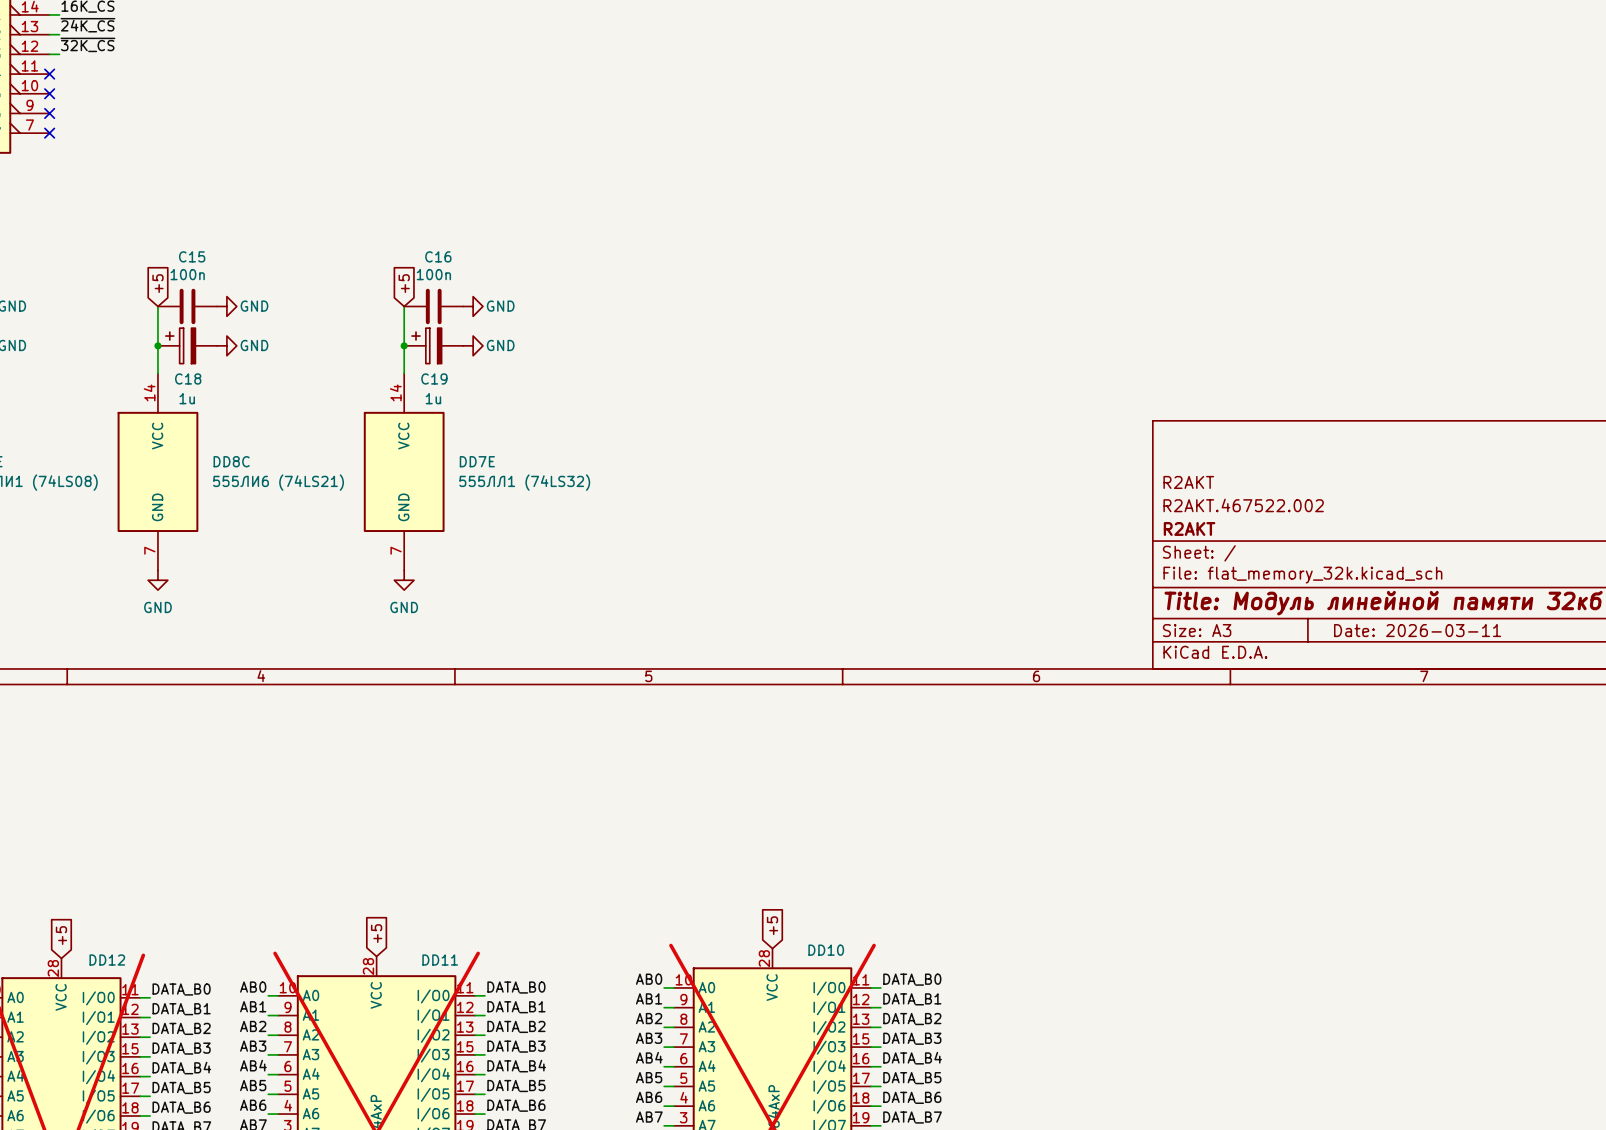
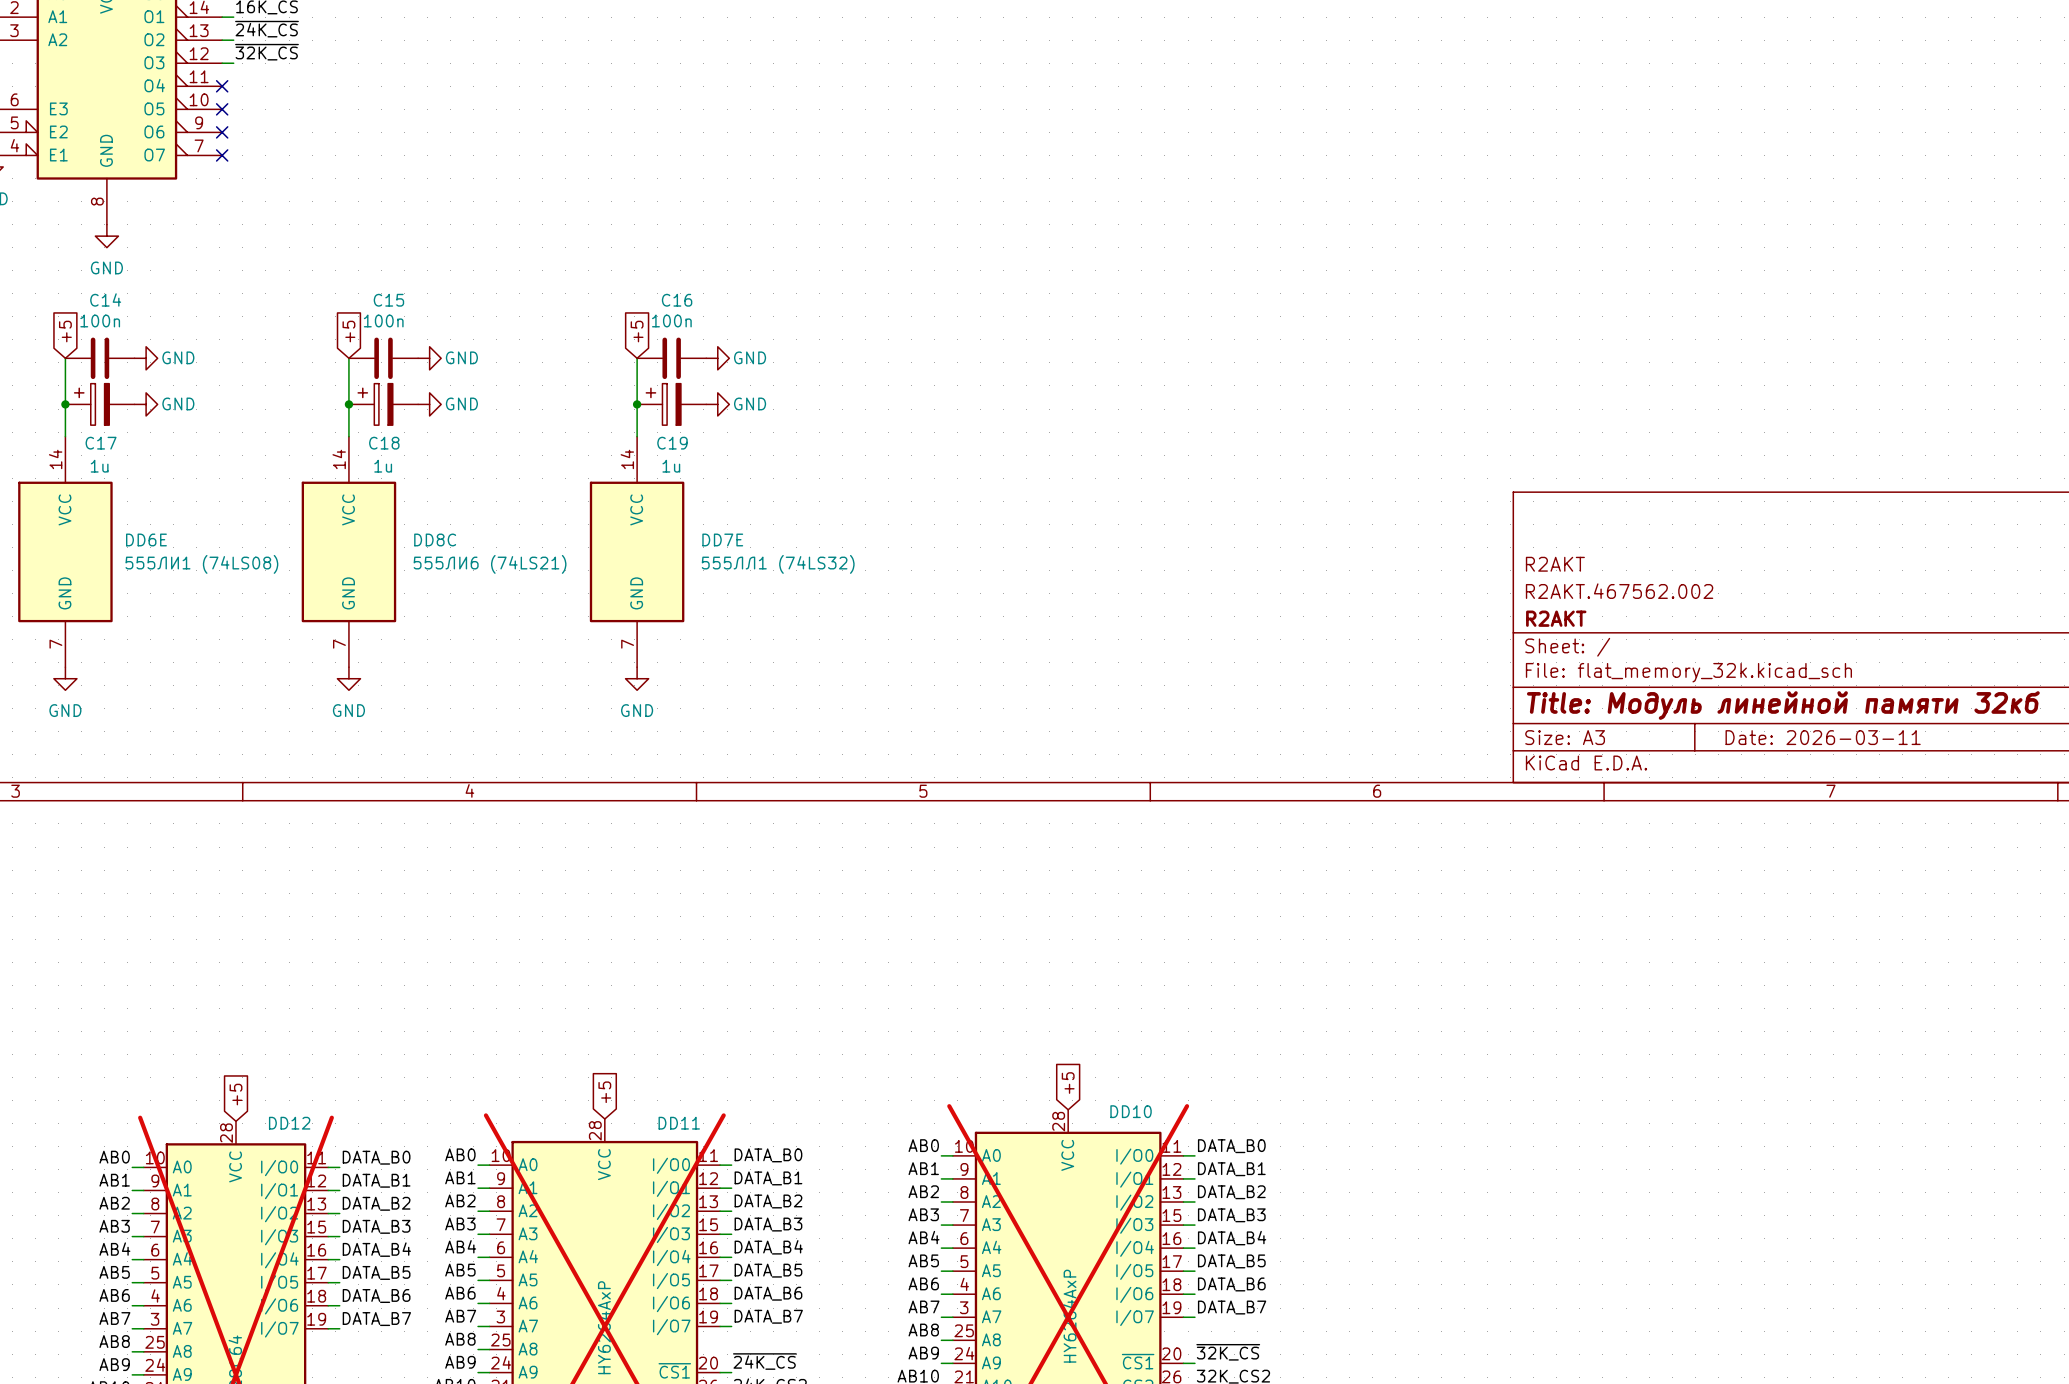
title block: R2AKT.467522.002 (1243, 505) -> R2AKT.467562.002 (1619, 591)

